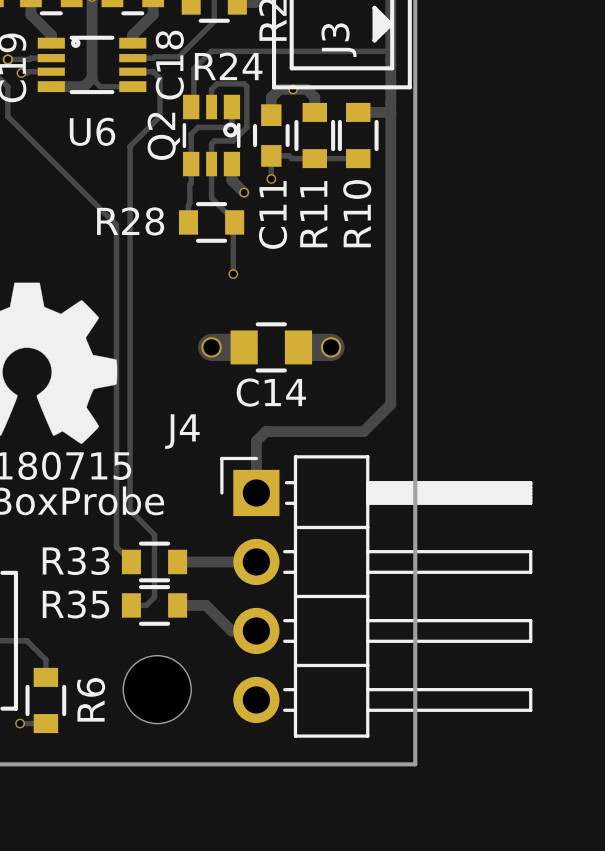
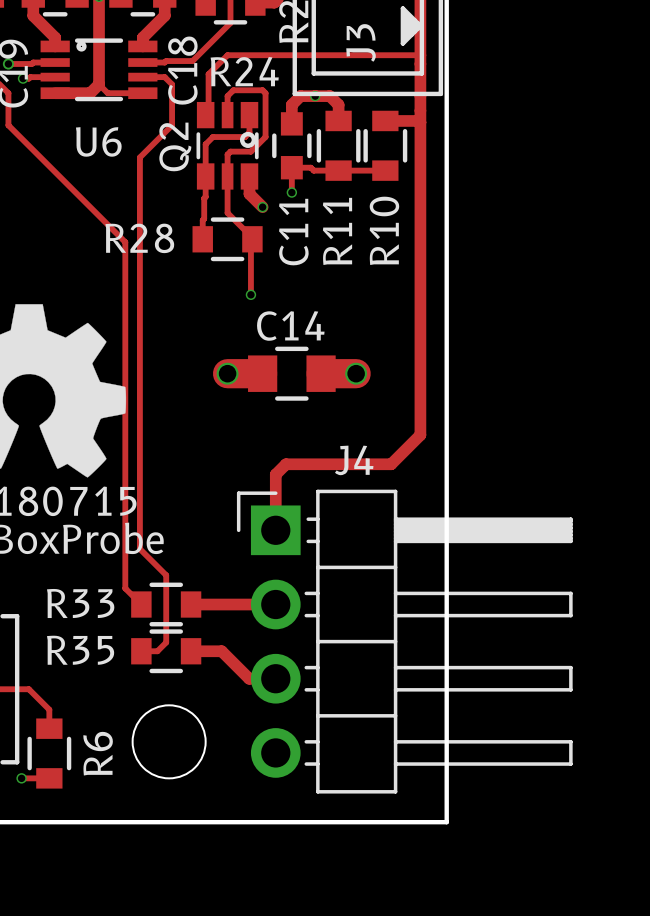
C14 name position: C14 (271, 392) -> C14 (290, 326)
J4 name position: J4 (182, 431) -> J4 (354, 460)

